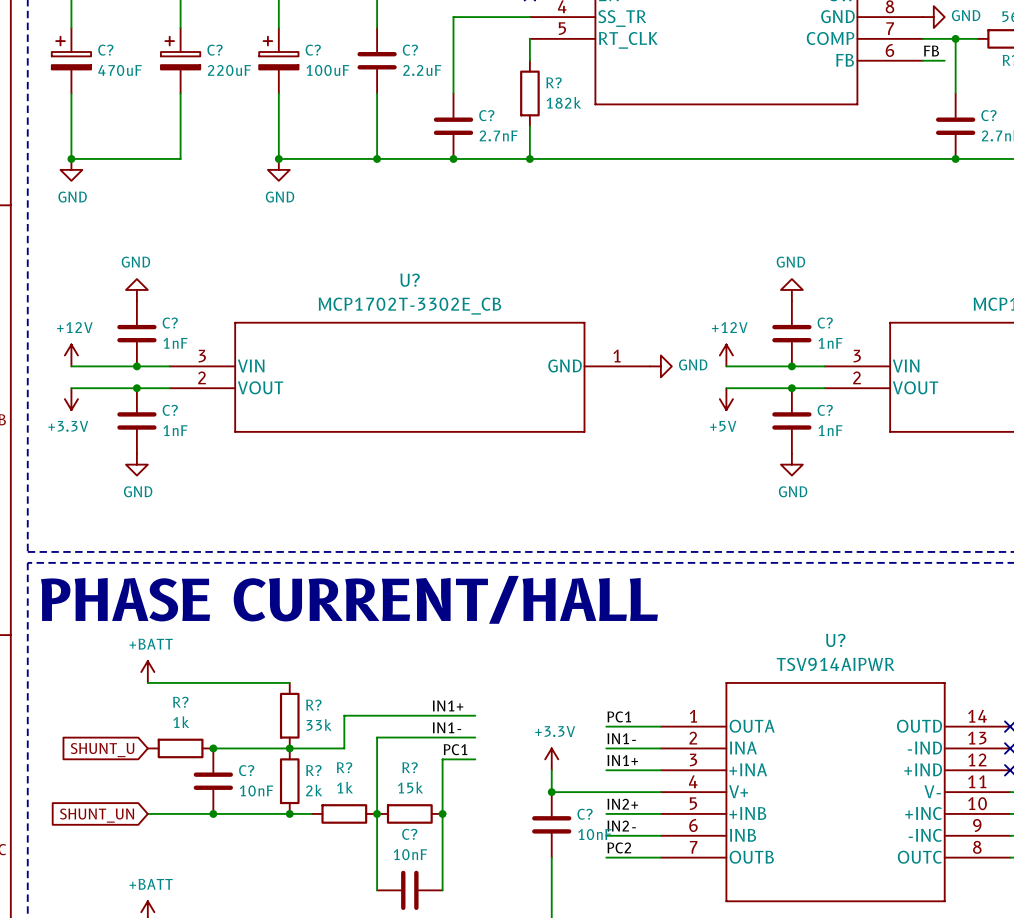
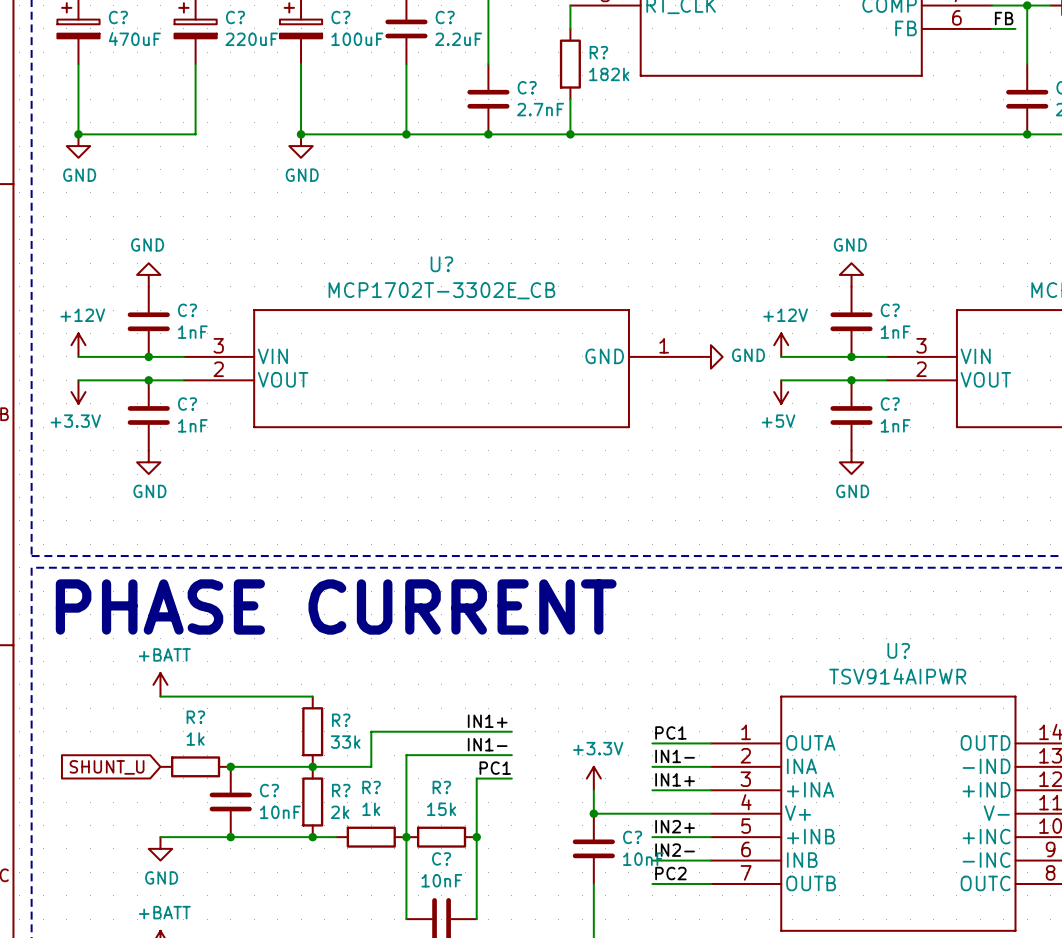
text: PHASE CURRENT/HALL (349, 599) -> PHASE CURRENT (336, 606)
global label: SHUNT_UN (97, 815) -> none
power symbol: none -> GND (160, 848)

